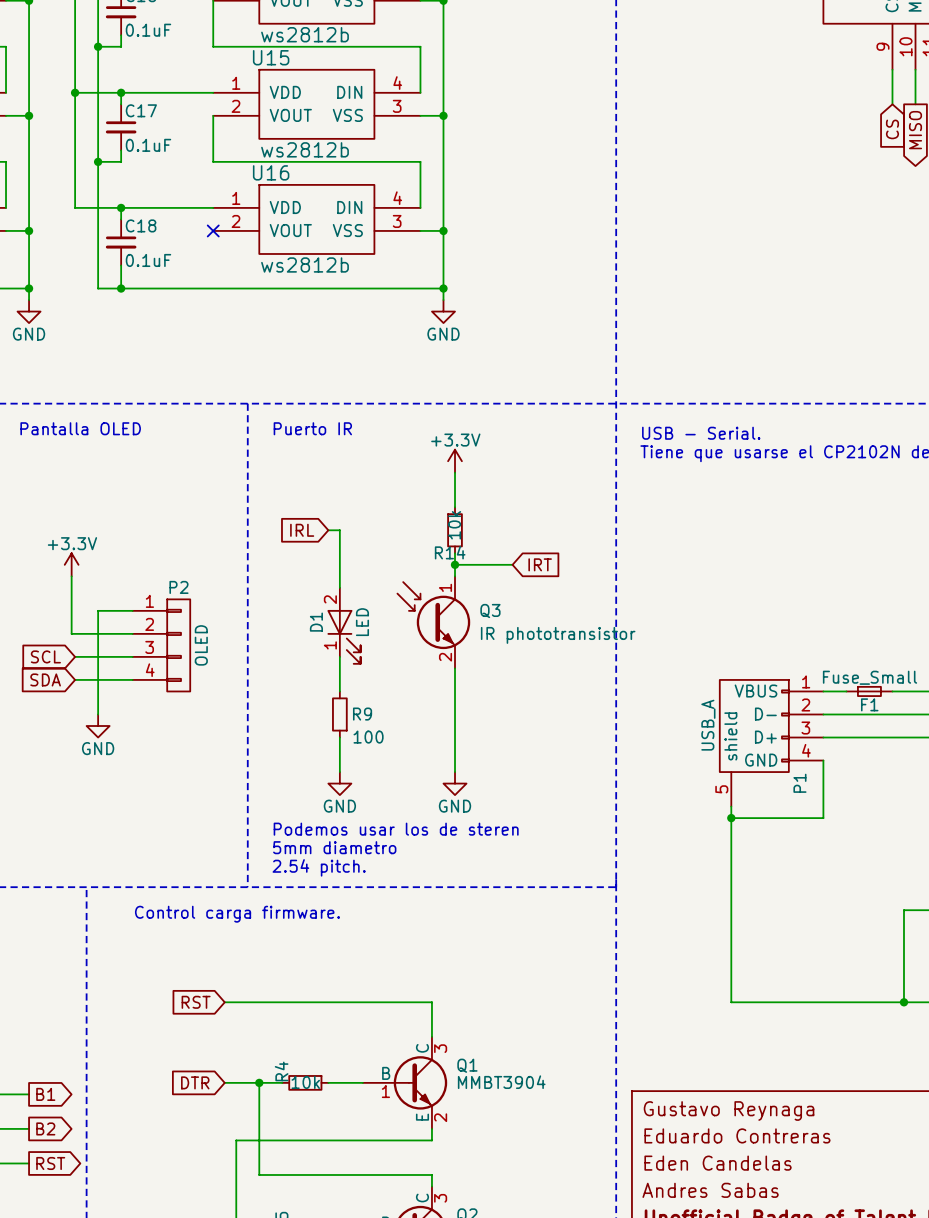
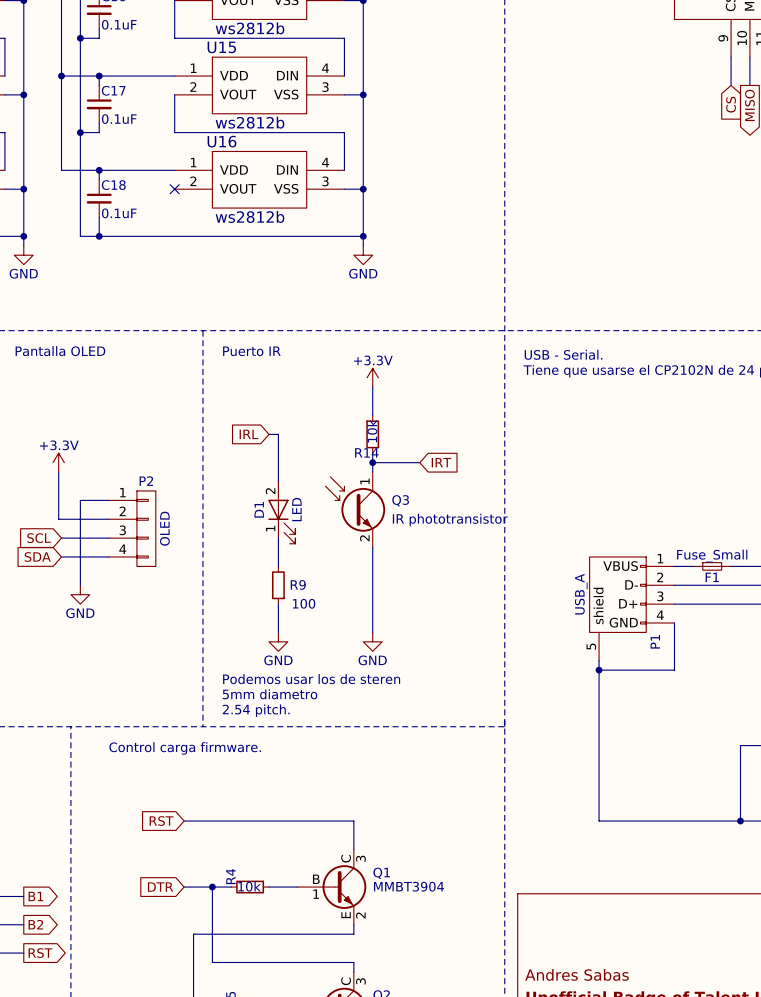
title block: Gustavo Reynaga (729, 1111) -> none
title block: Eduardo Contreras (737, 1135) -> none
title block: Eden Candelas (718, 1163) -> none

